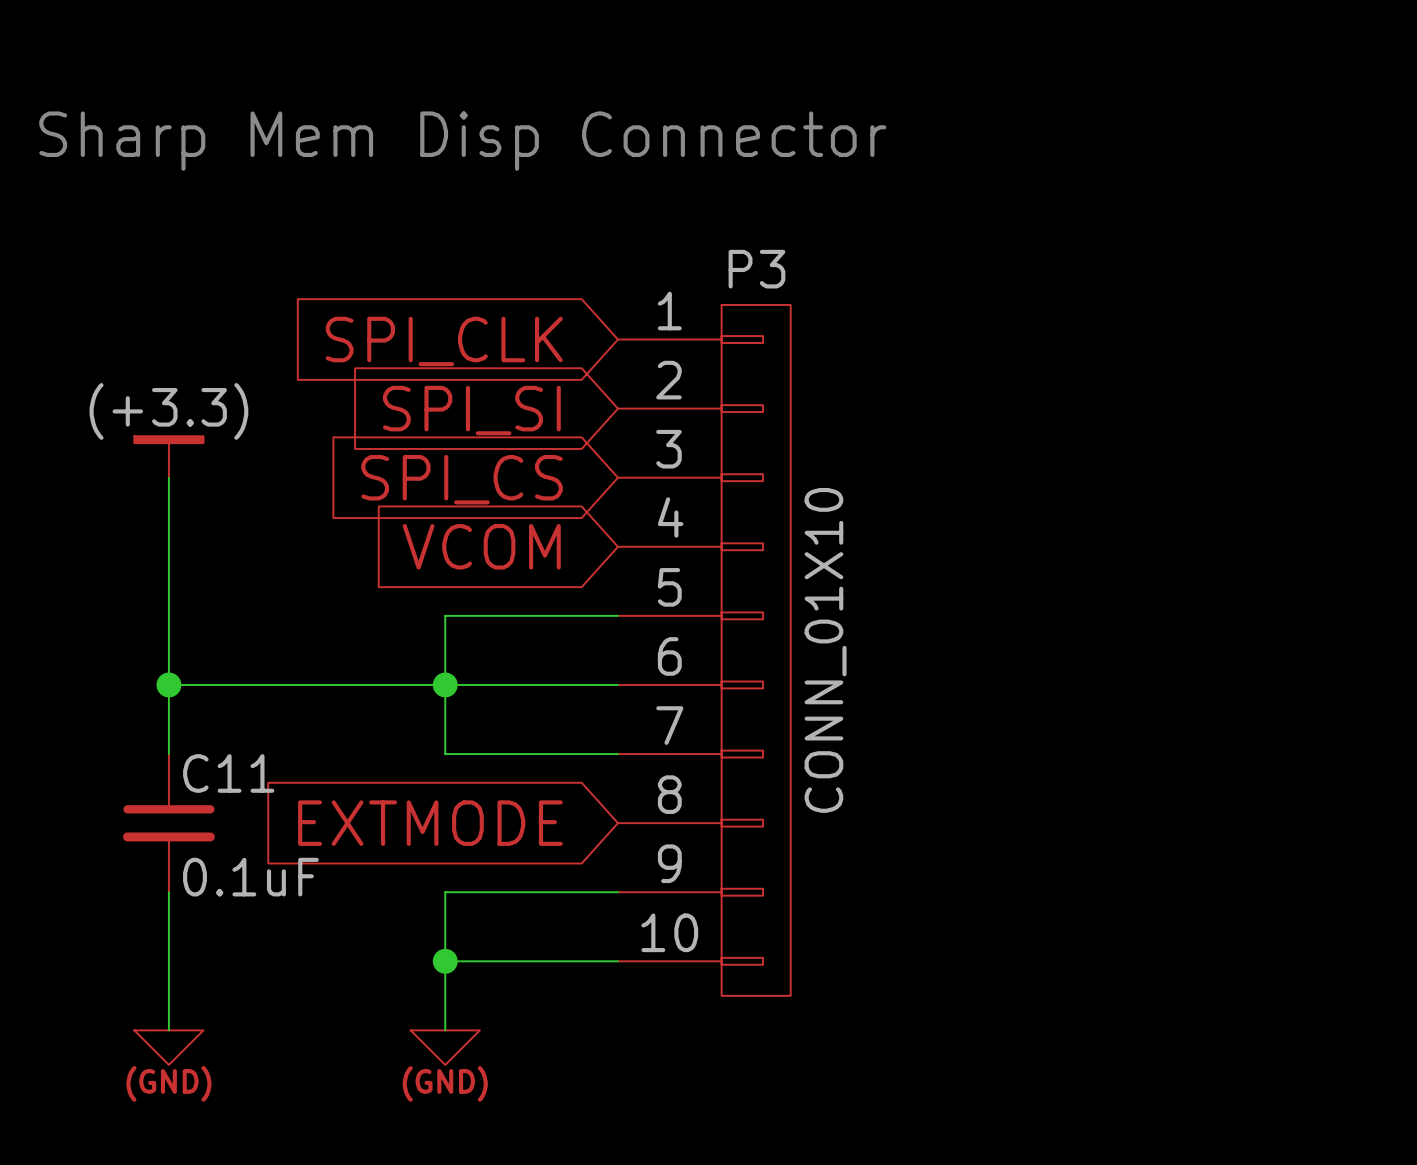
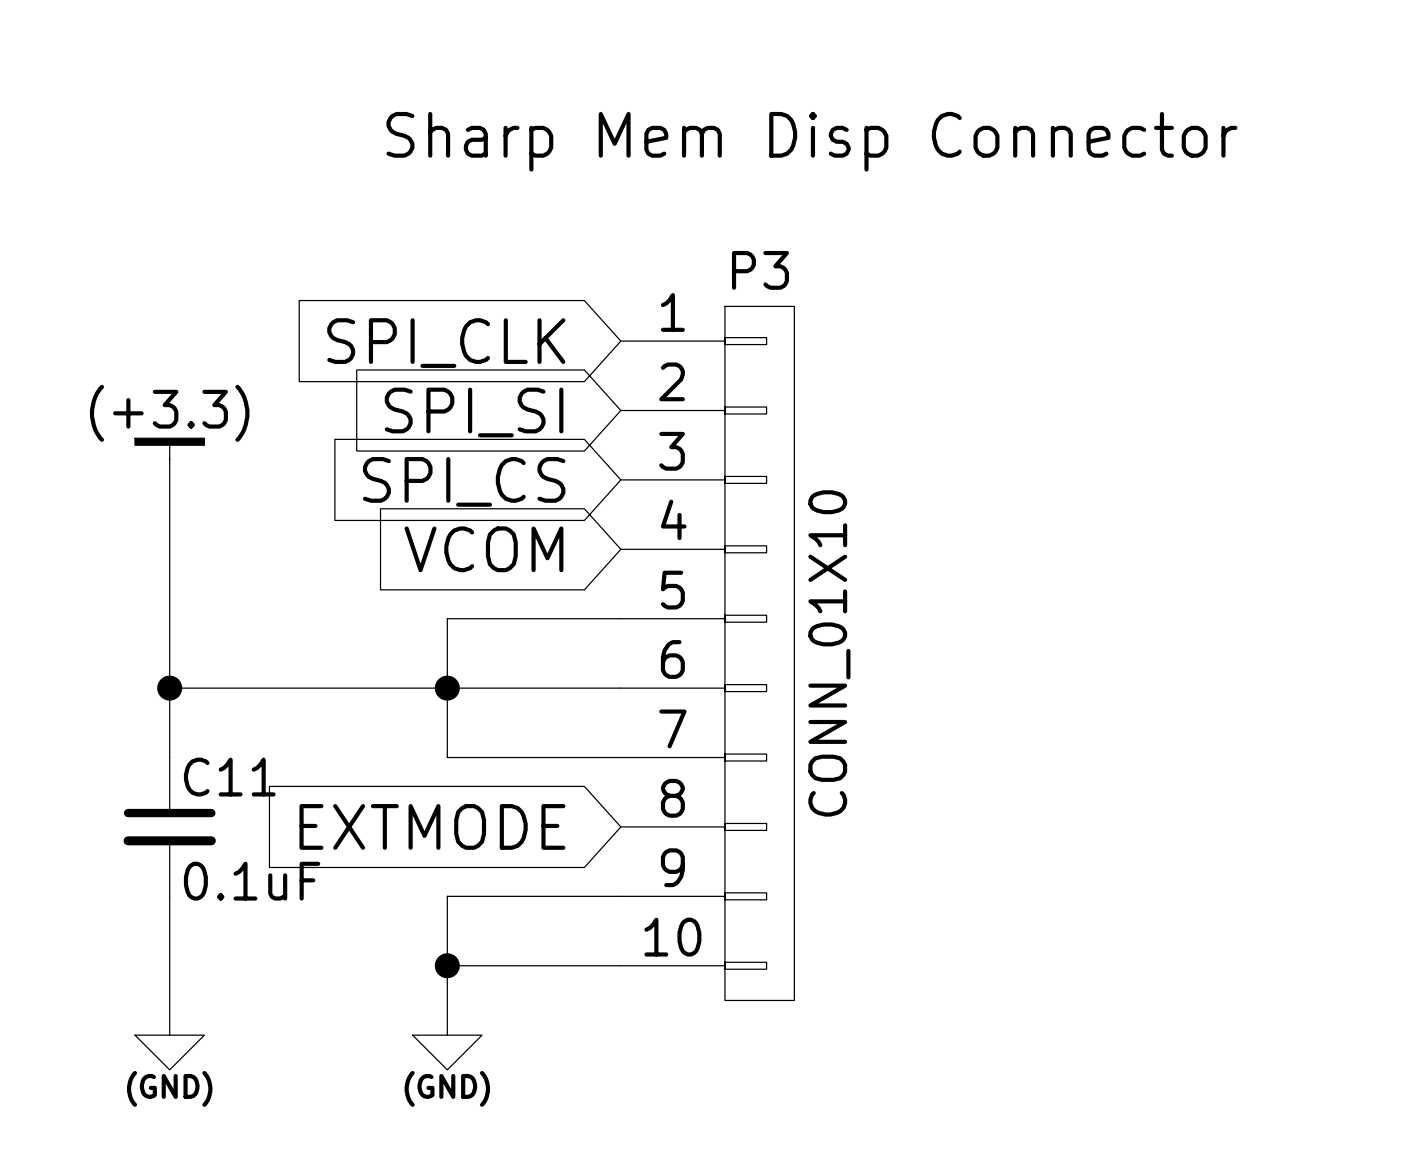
text position: Sharp Mem Disp Connector (462, 141) -> Sharp Mem Disp Connector (811, 141)

